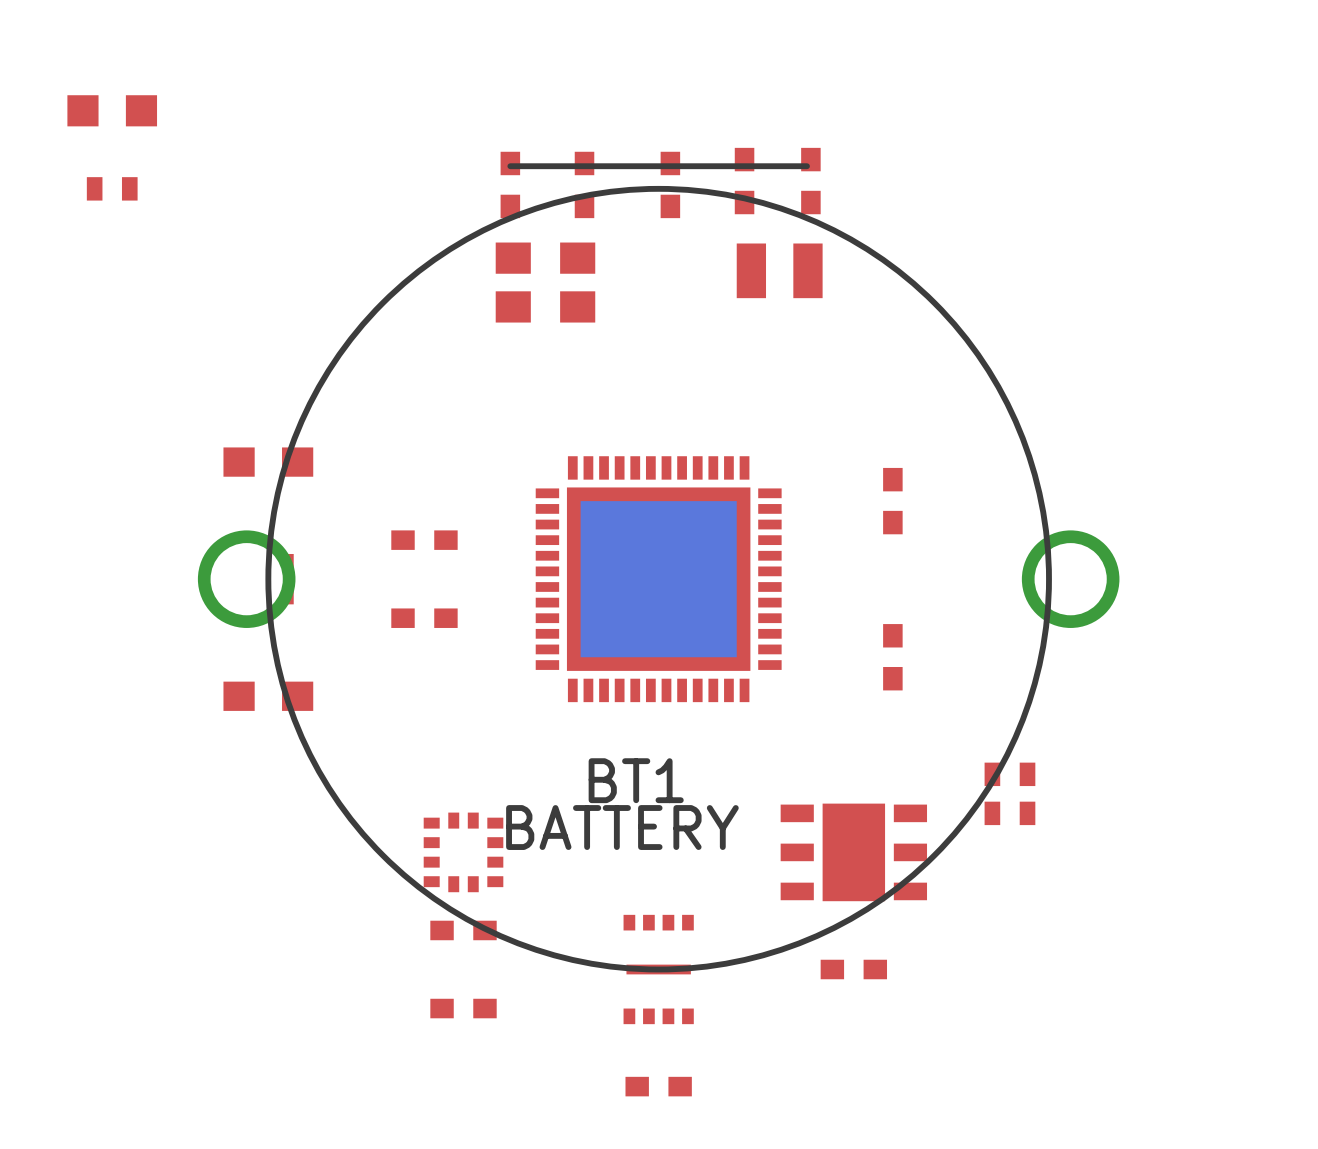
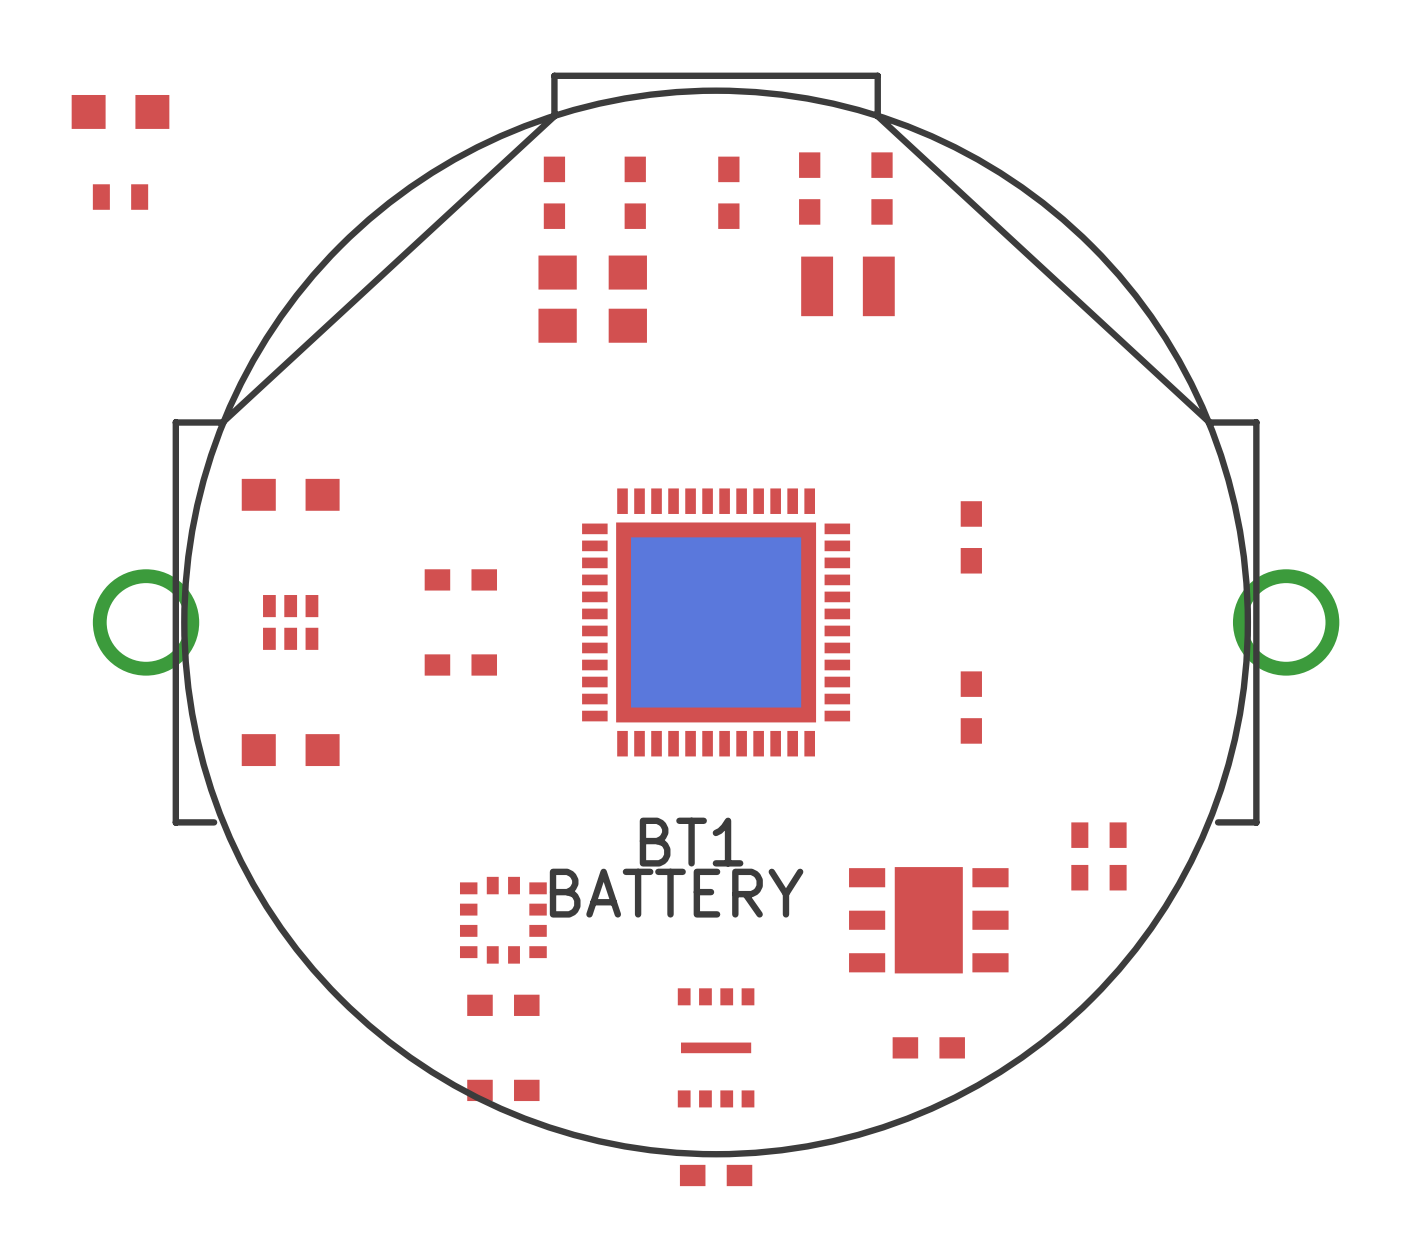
BT1 footprint: [197, 163, 1120, 973] -> [92, 72, 1340, 1158]

